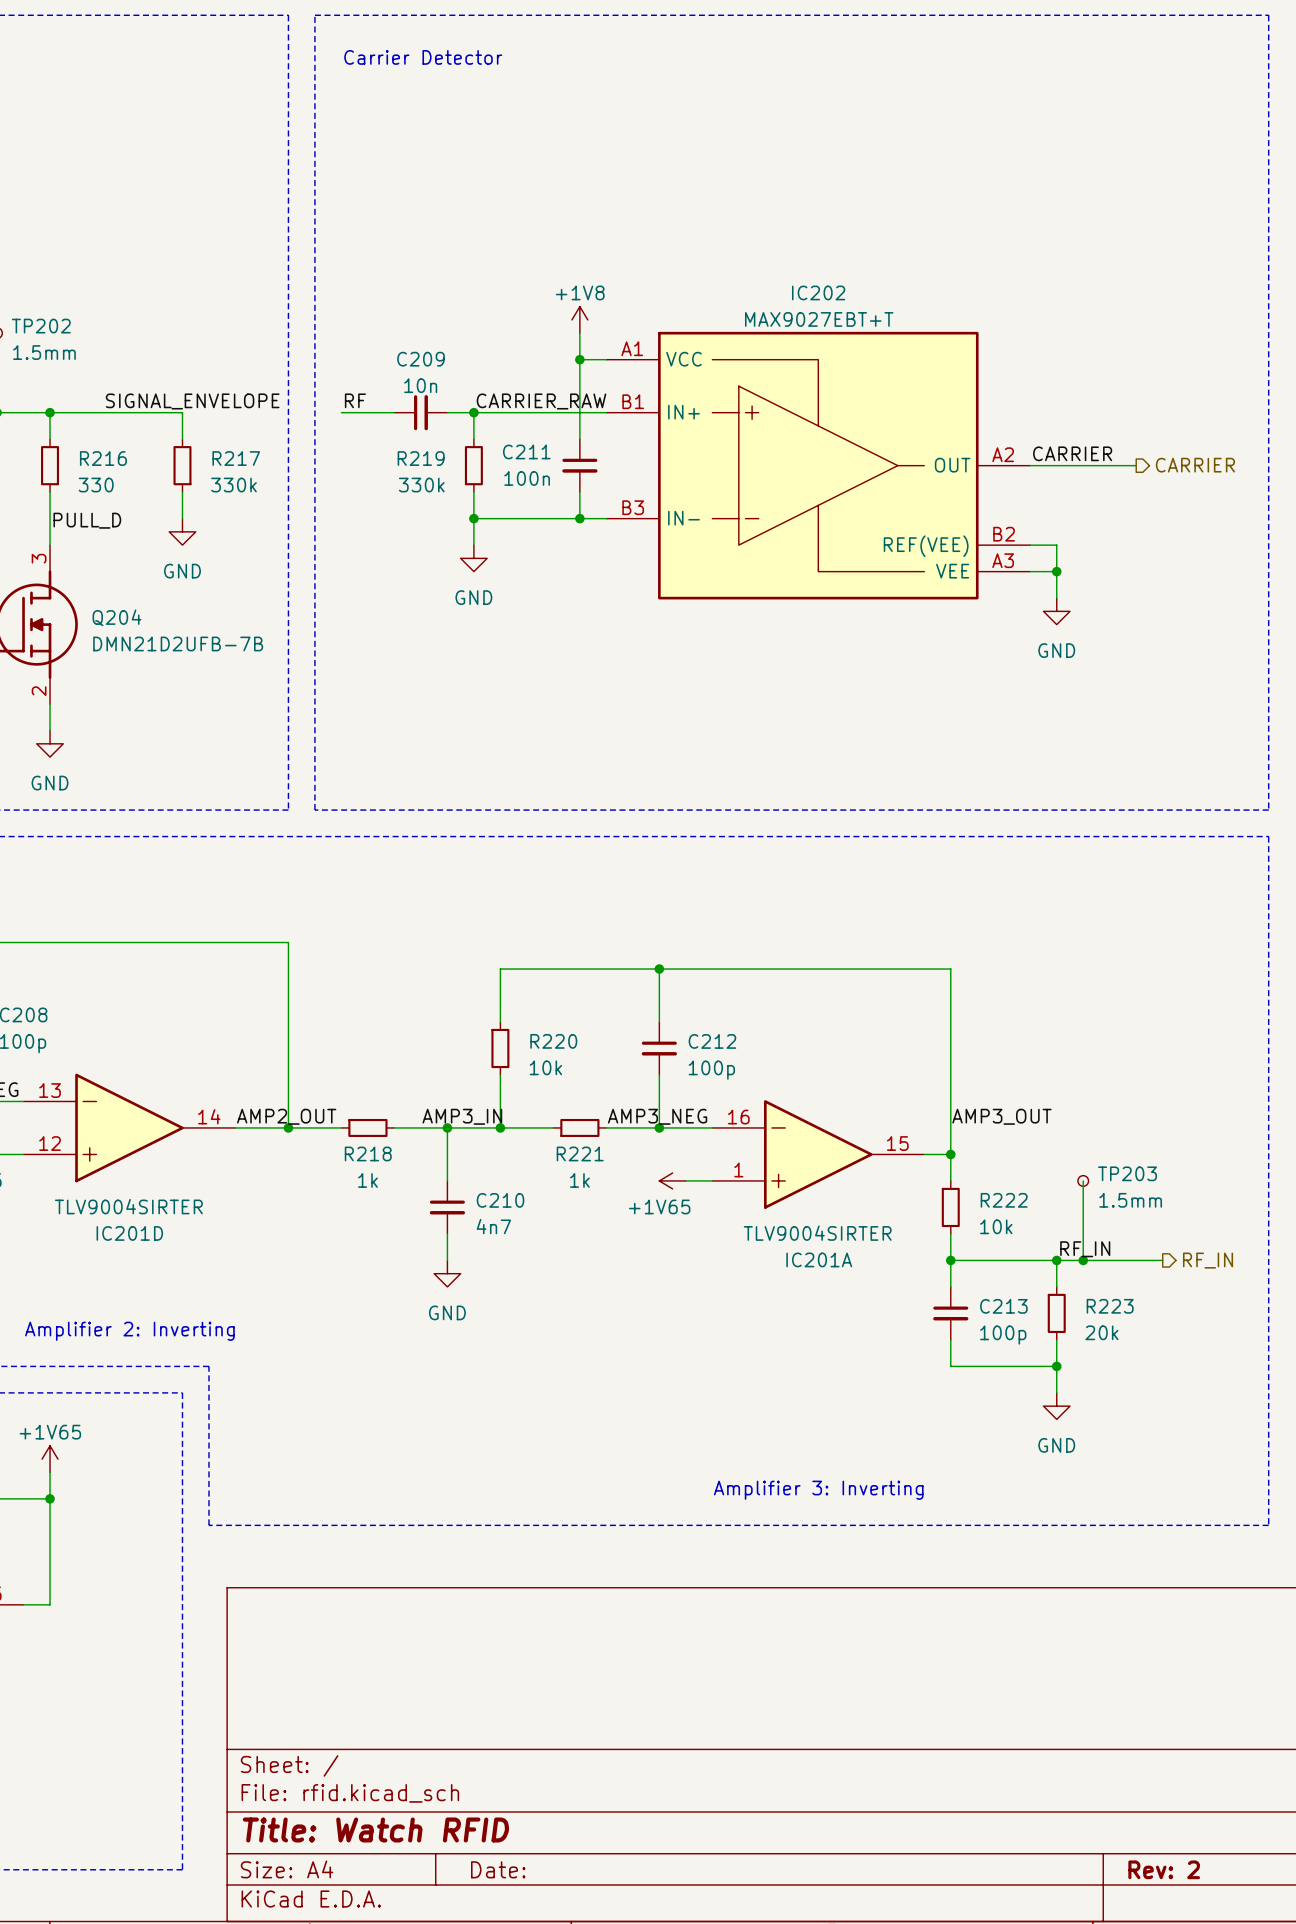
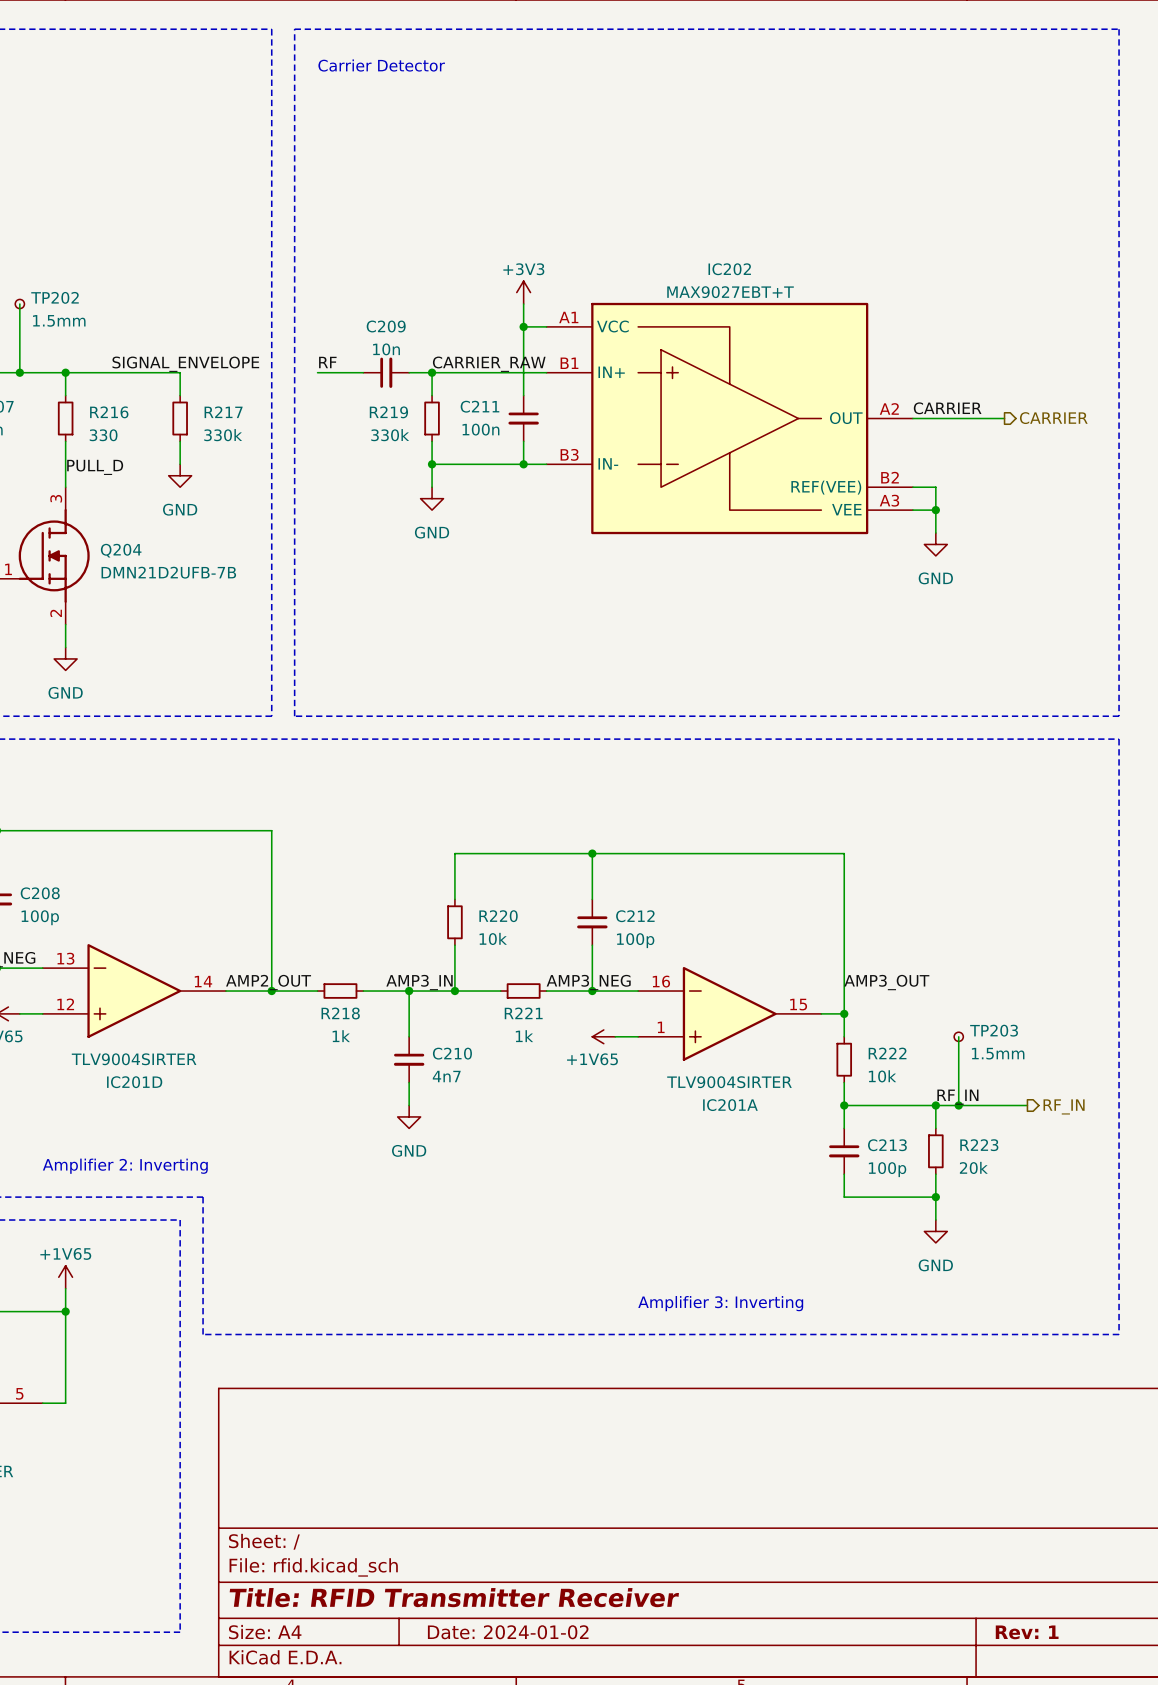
power symbol: +1V8 (579, 319) -> +3V3 (523, 292)
title block: Title: Watch RFID (375, 1829) -> Title: RFID Transmitter Receiver (454, 1597)
title block: Date: (498, 1869) -> Date: 2024-01-02 (508, 1632)
title block: Rev: 2 (1164, 1869) -> Rev: 1 (1027, 1632)

